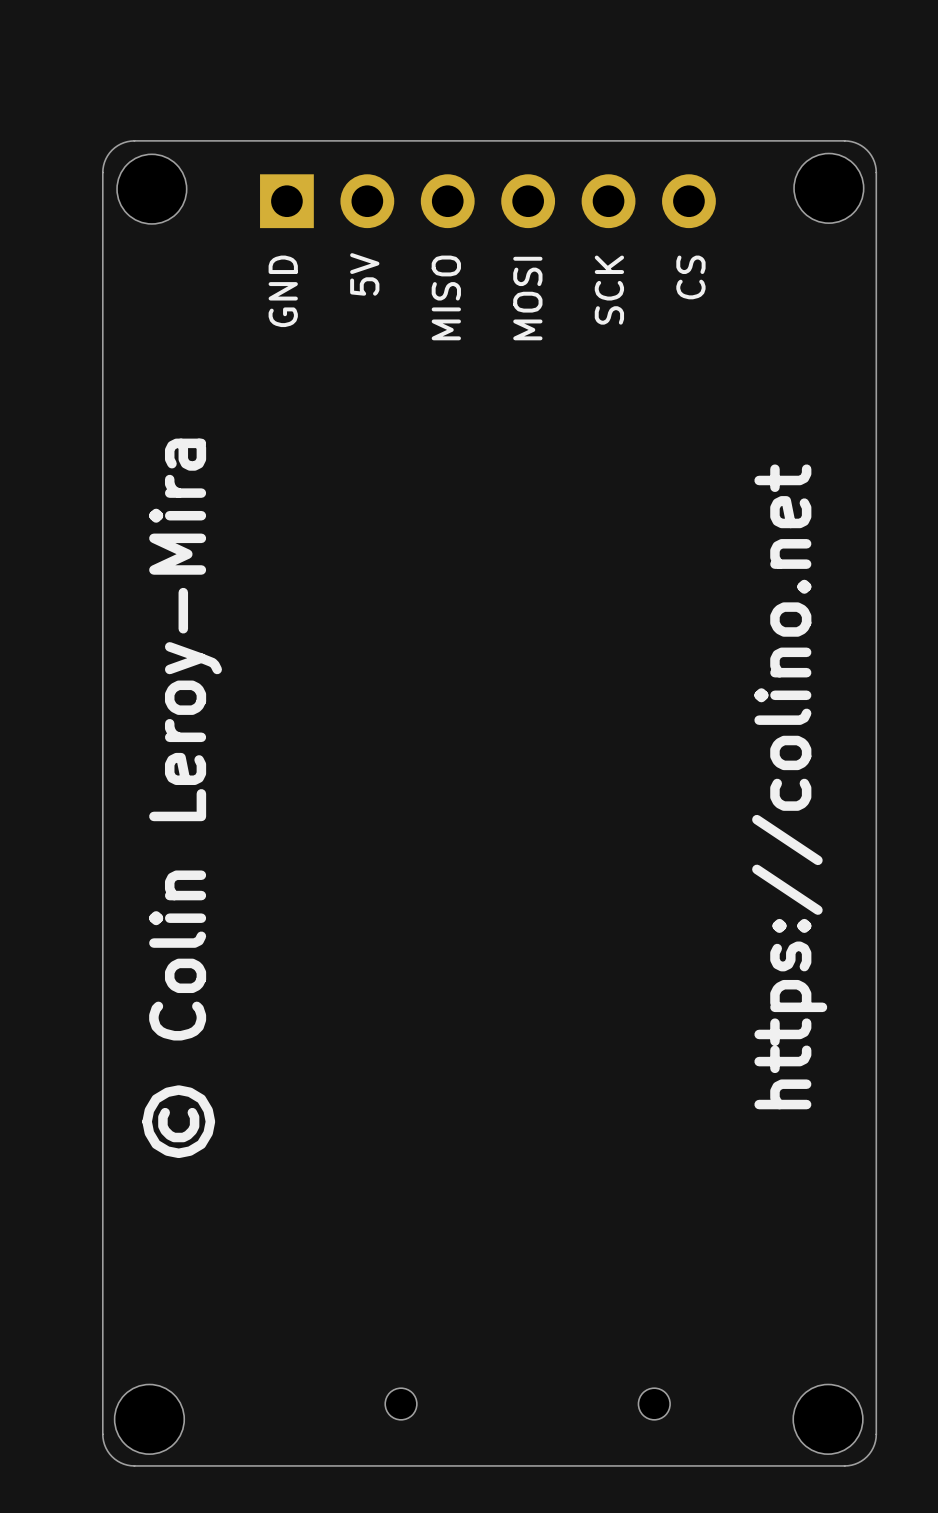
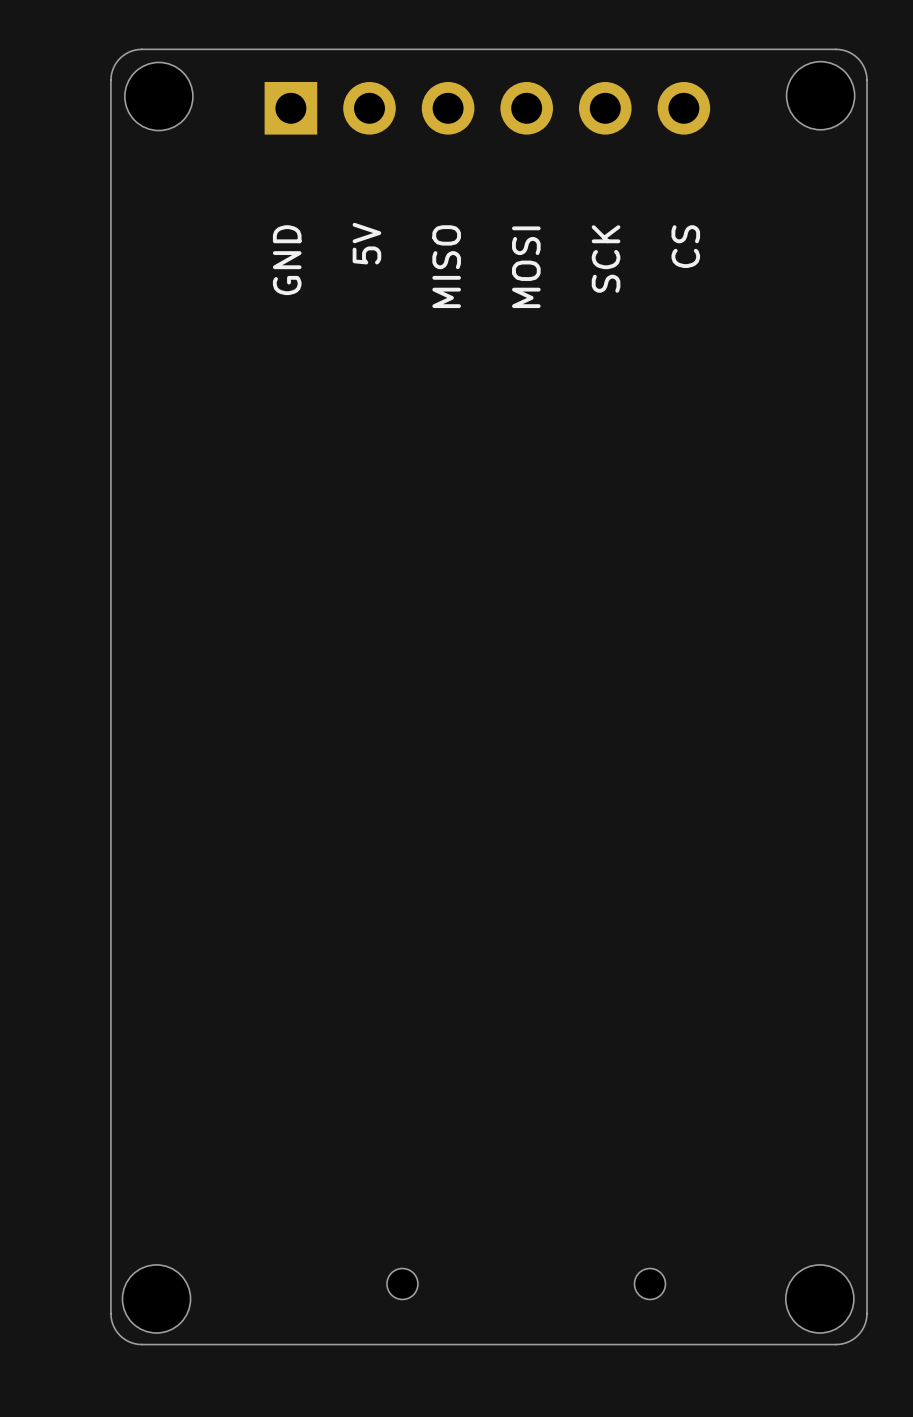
text position: 5V (364, 274) -> 5V (366, 243)
text position: CS (690, 277) -> CS (685, 246)
text position: SCK (609, 290) -> SCK (606, 258)
text position: GND (283, 291) -> GND (287, 260)
text position: MISO (446, 297) -> MISO (446, 266)
text position: MOSI (527, 298) -> MOSI (526, 267)
text: https://colino.net (789, 786) -> none
text: © Colin Leroy-Mira (182, 798) -> none

